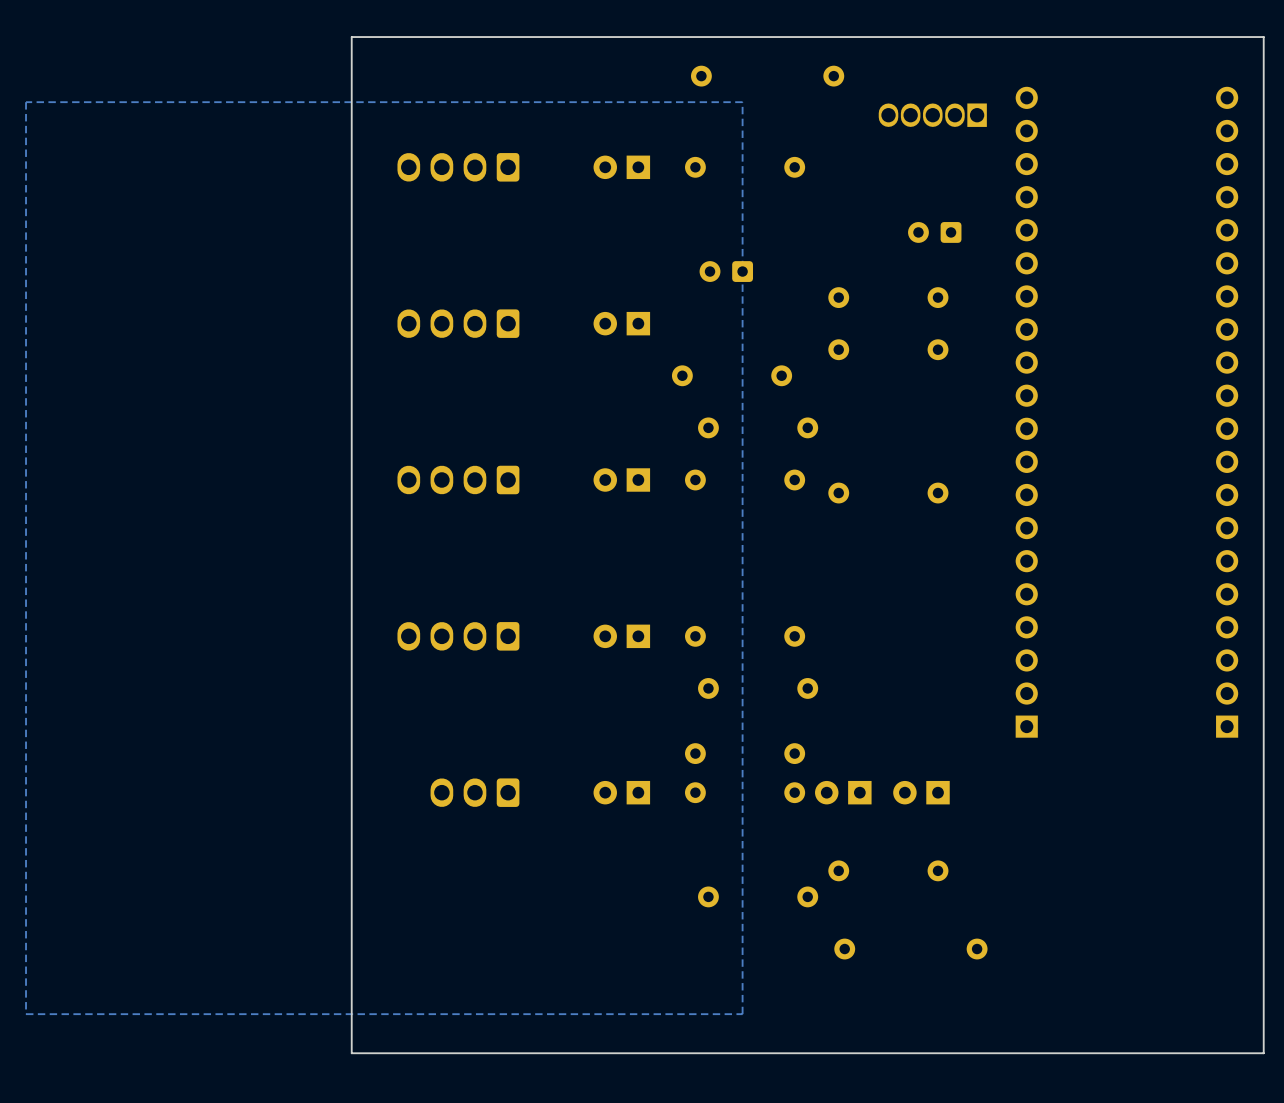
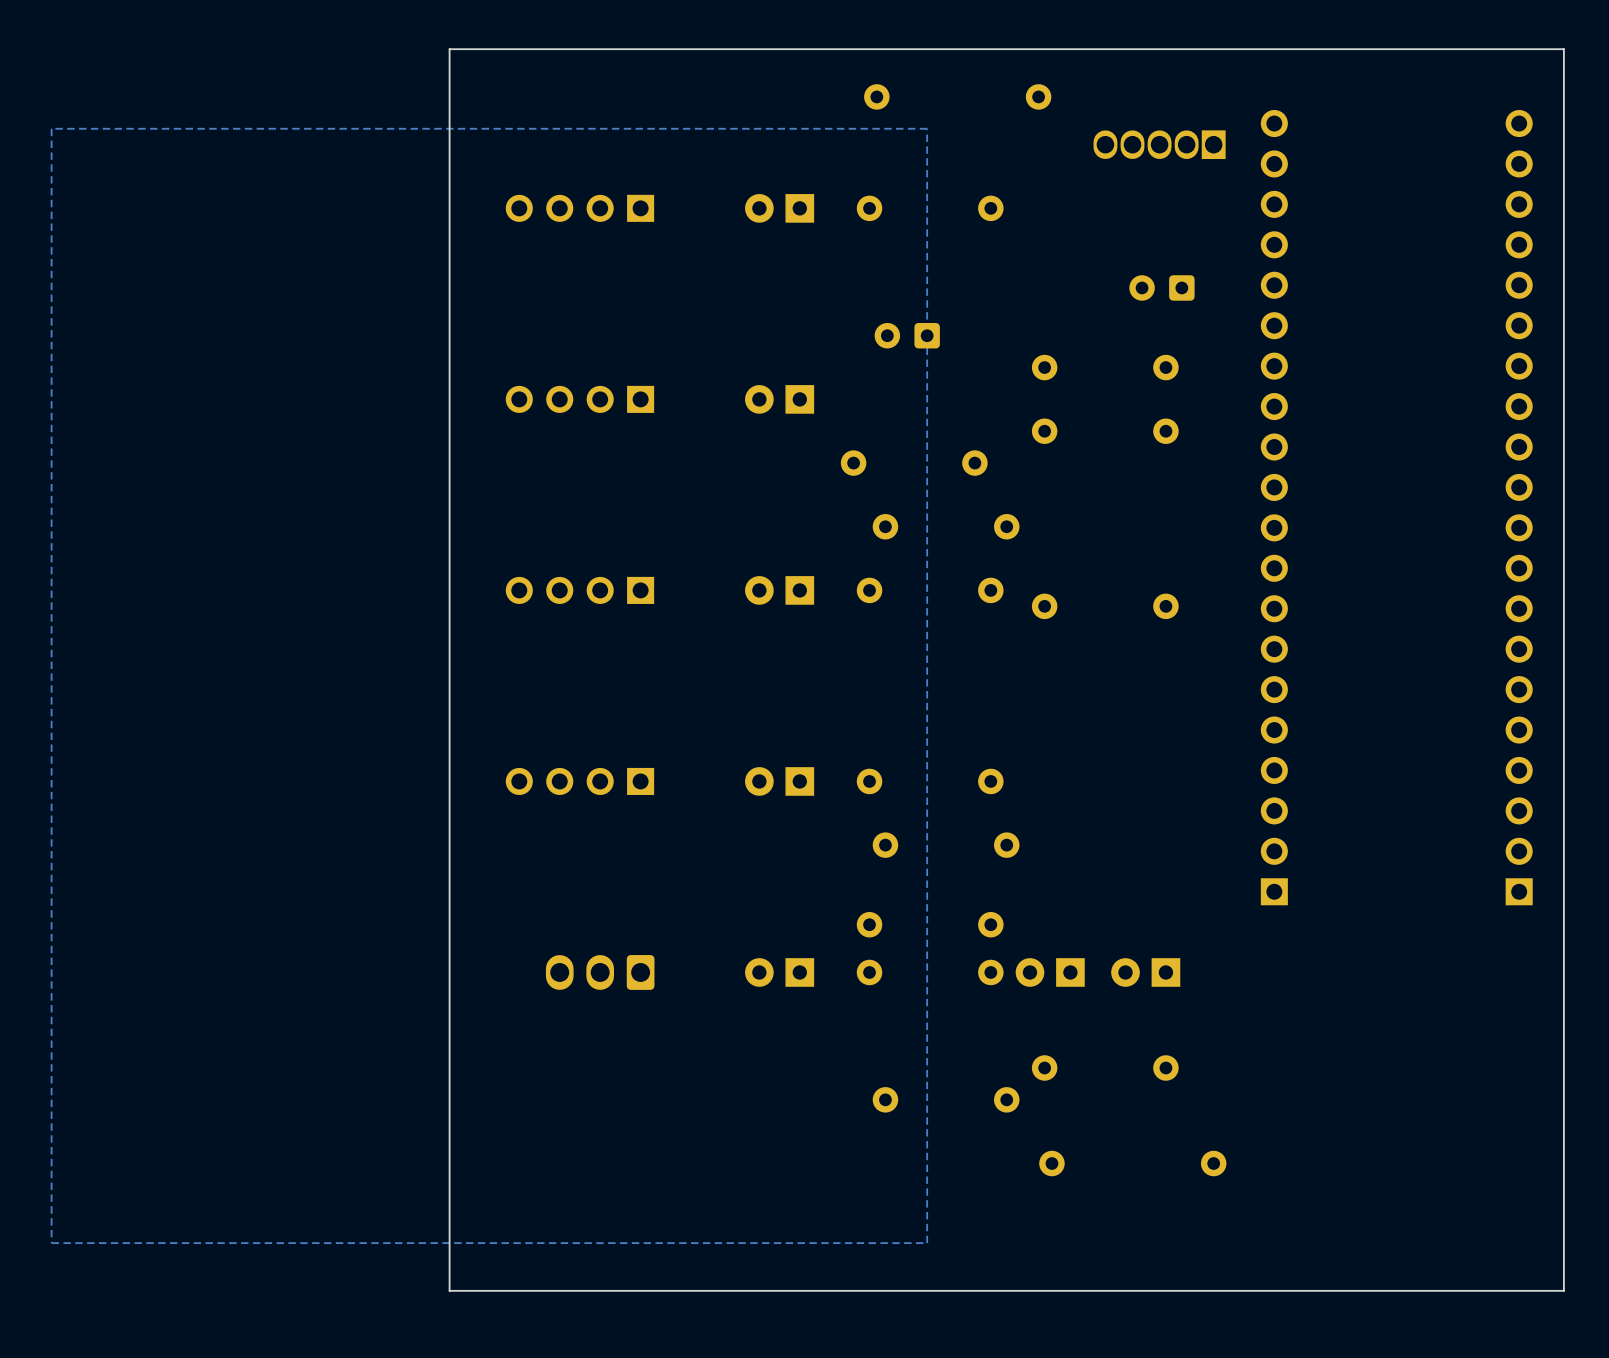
part footprint: [397, 153, 520, 182] -> [505, 194, 655, 222]
part footprint: [397, 309, 520, 338] -> [505, 385, 655, 413]
part footprint: [397, 465, 520, 495] -> [505, 576, 655, 604]
part footprint: [397, 622, 520, 651] -> [505, 767, 655, 795]

